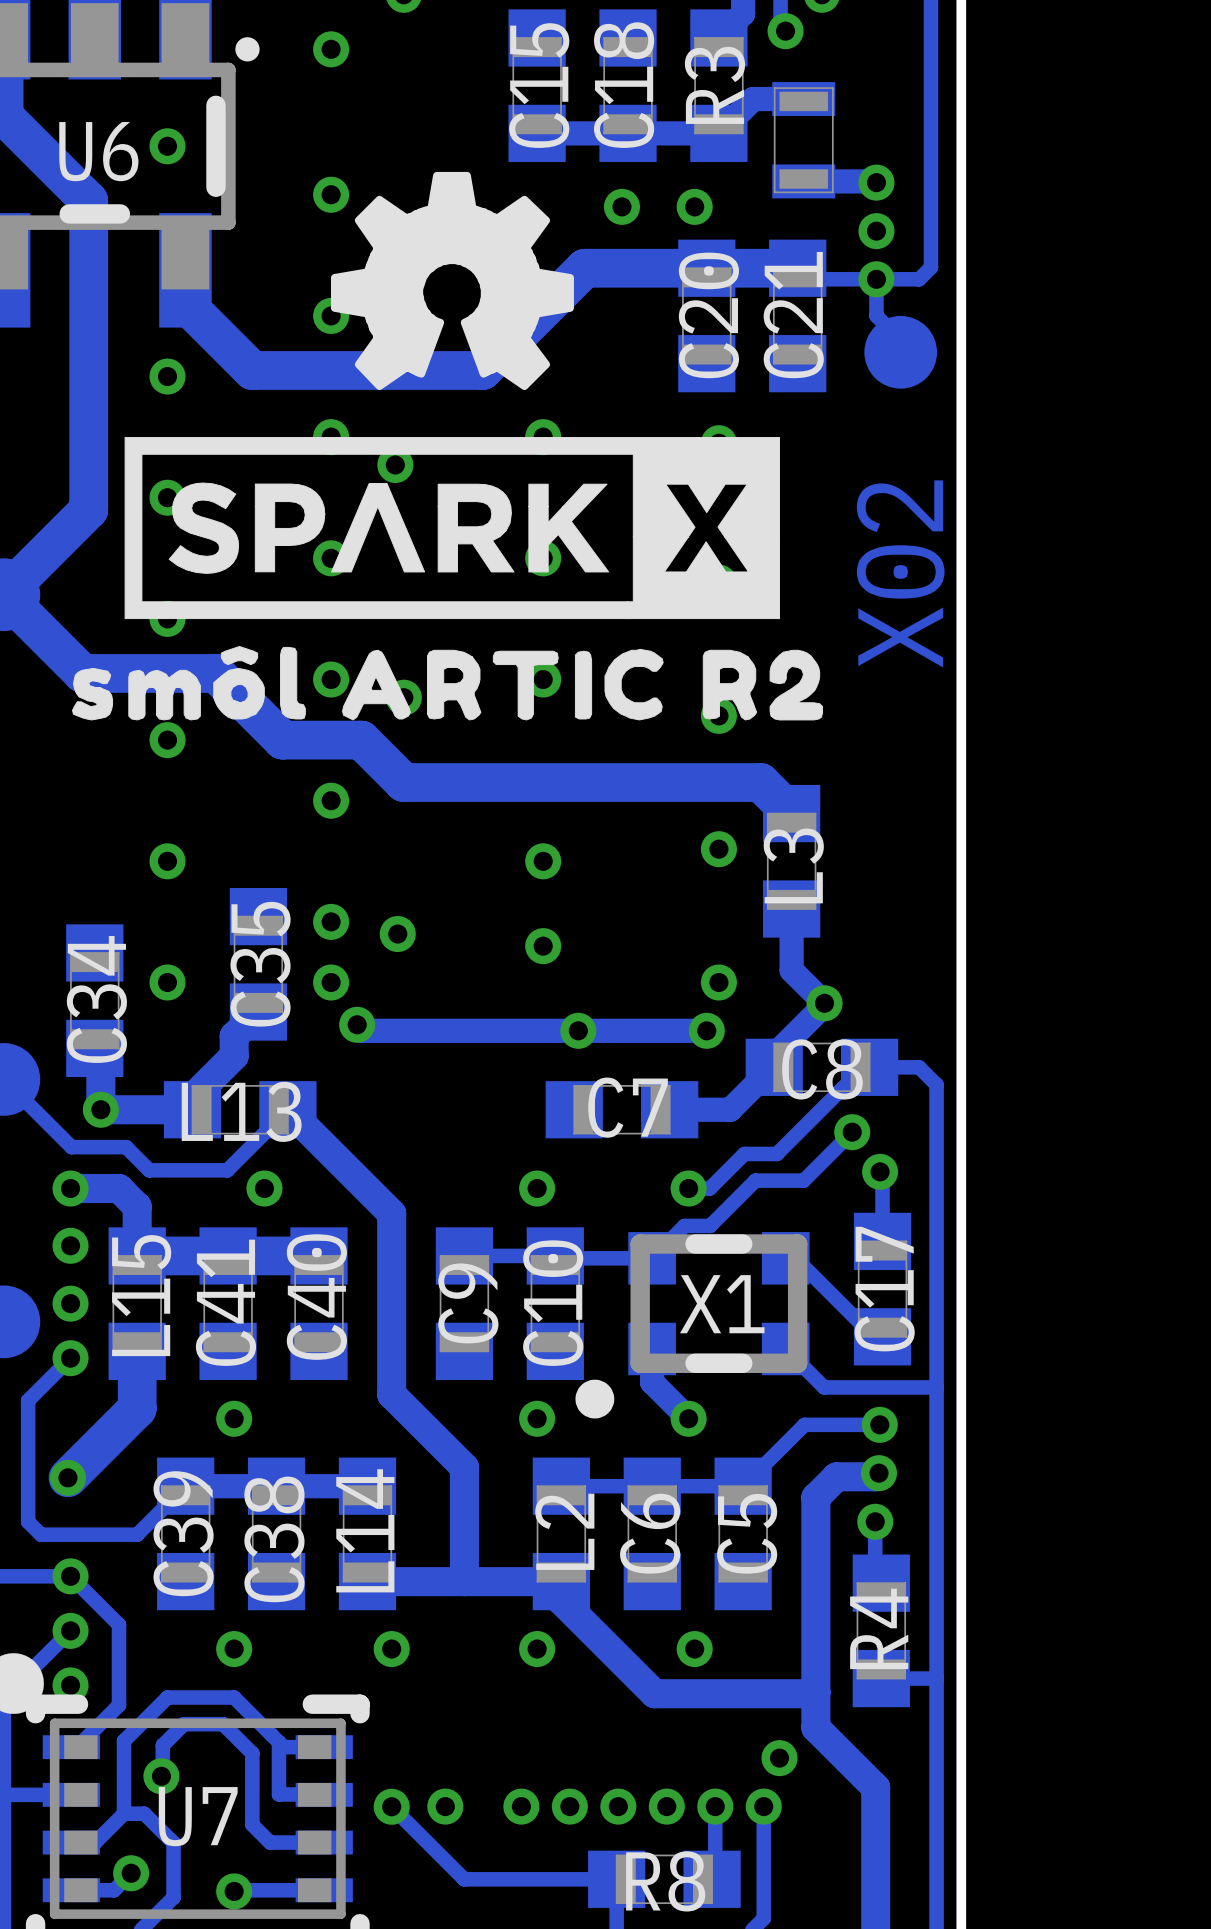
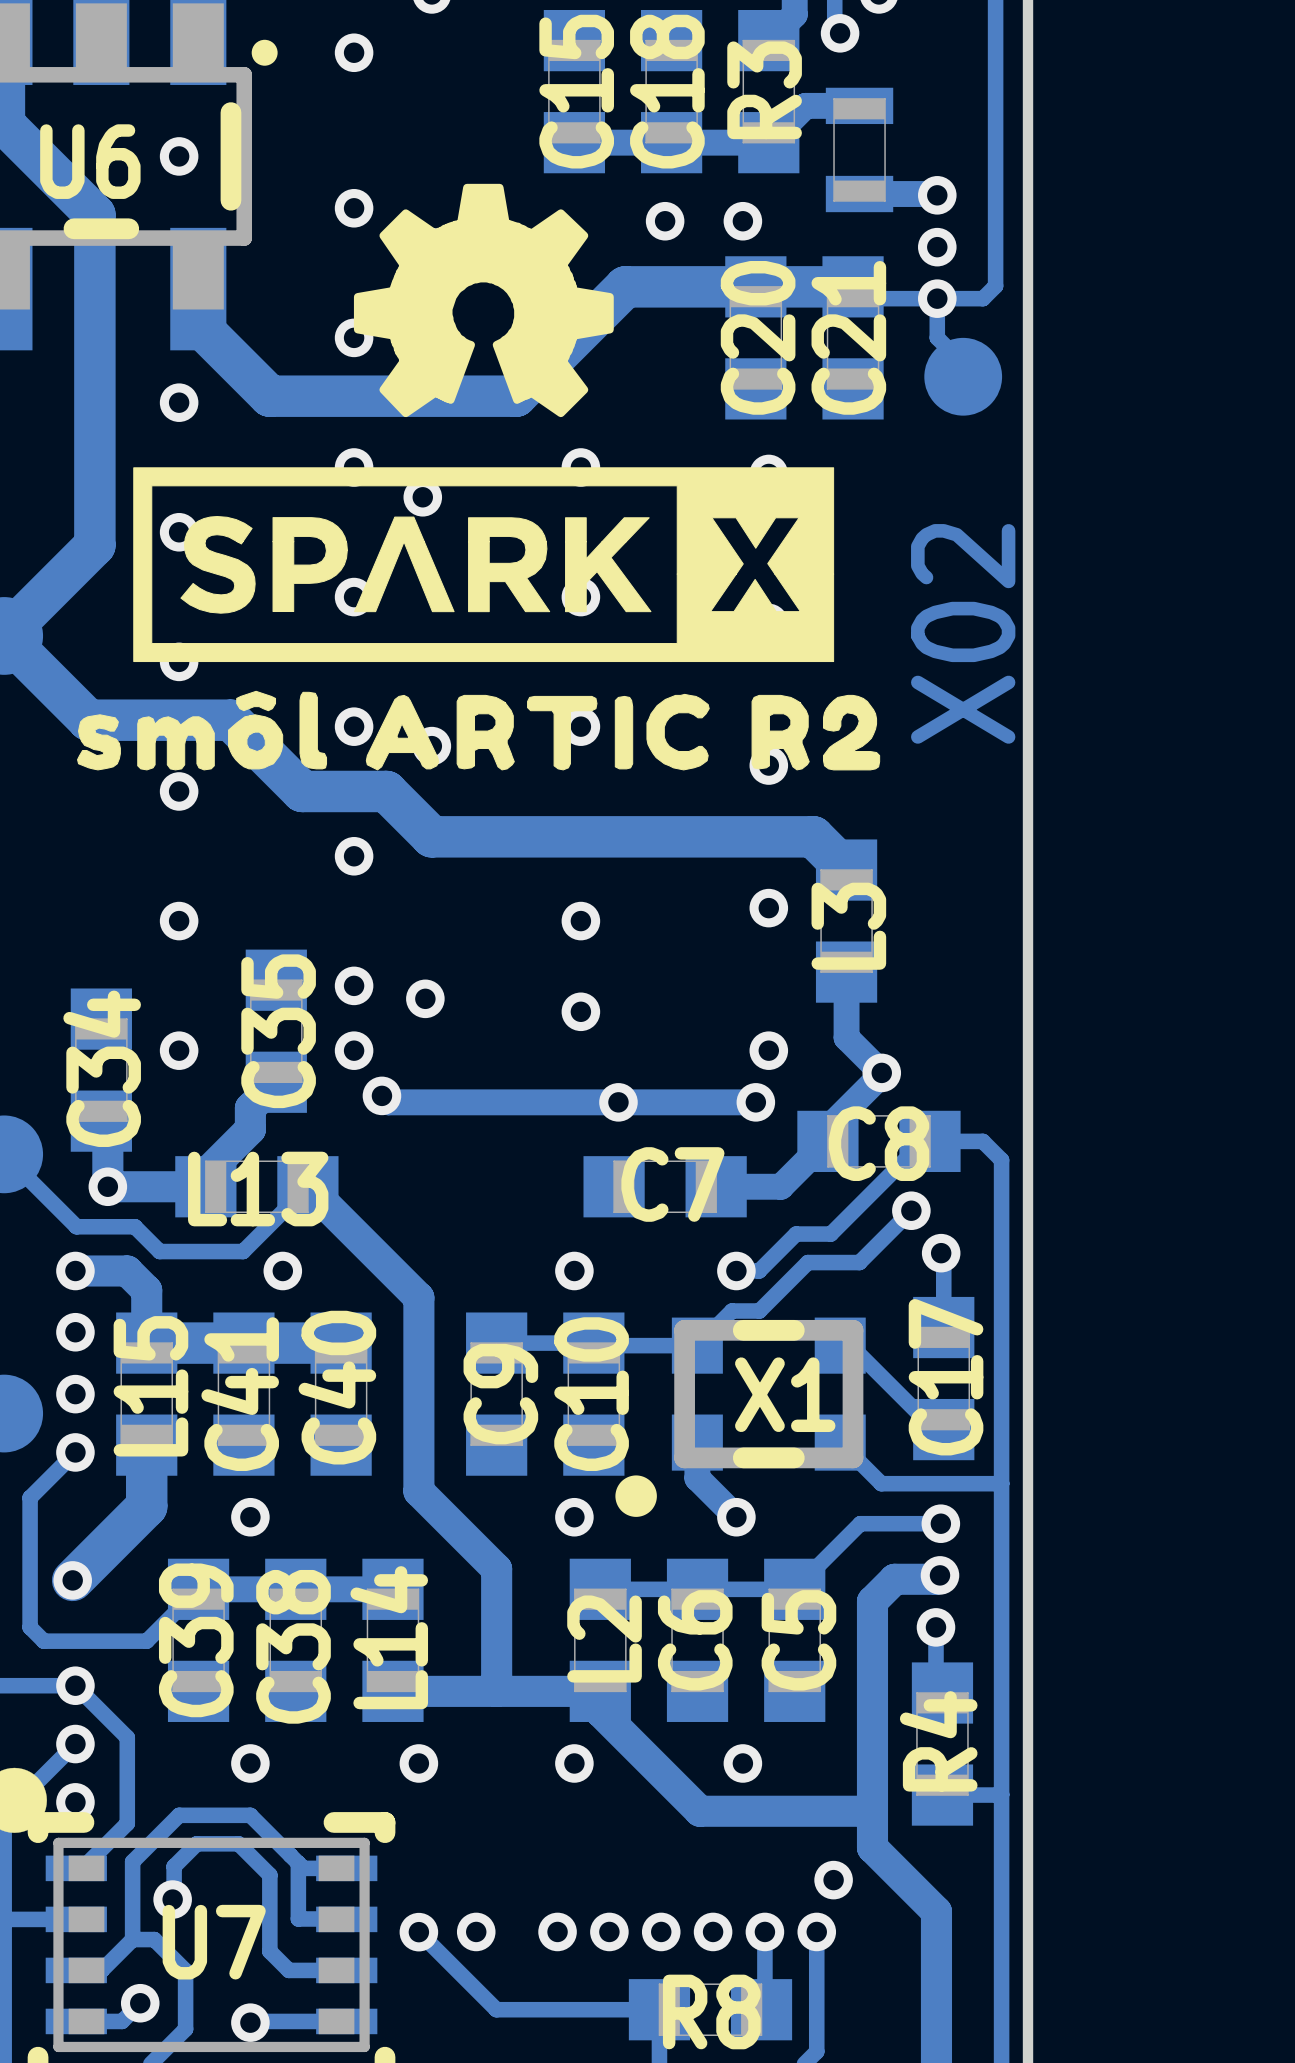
part footprint: [772, 82, 836, 199] -> [825, 87, 894, 213]

